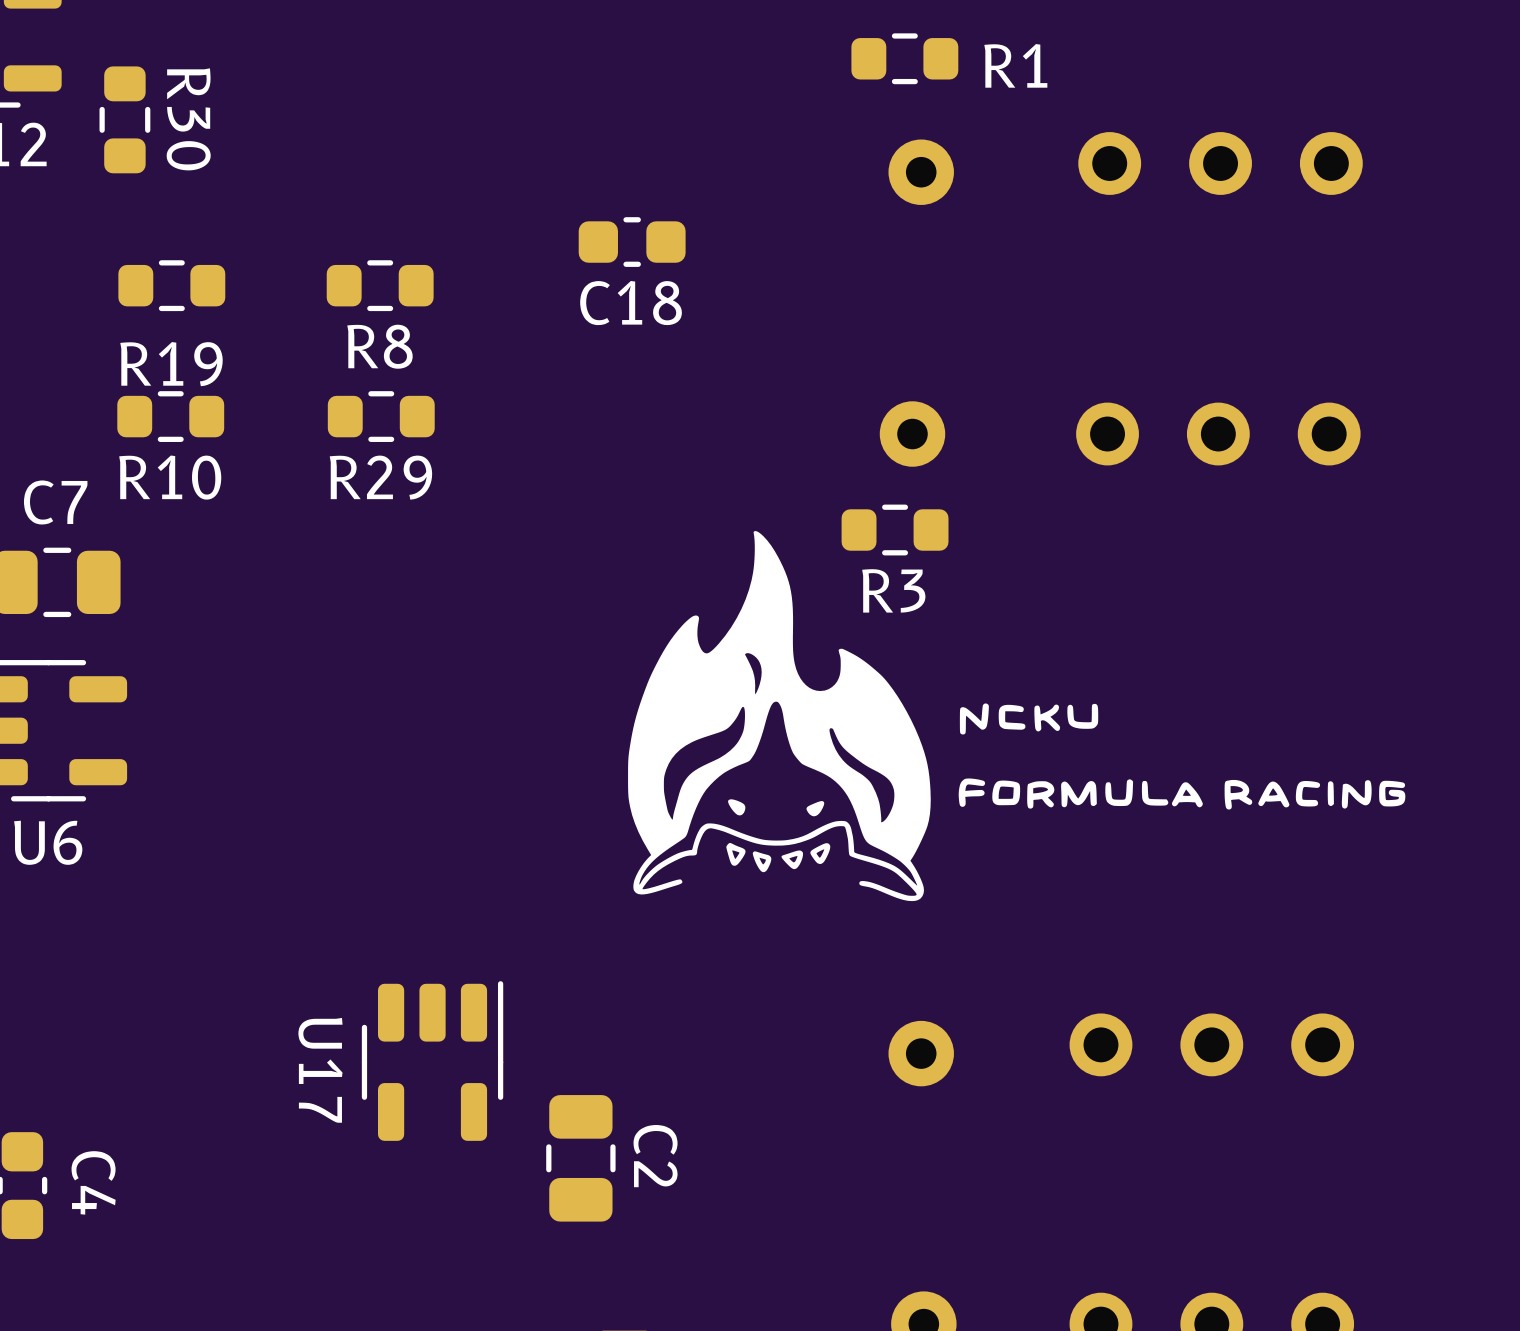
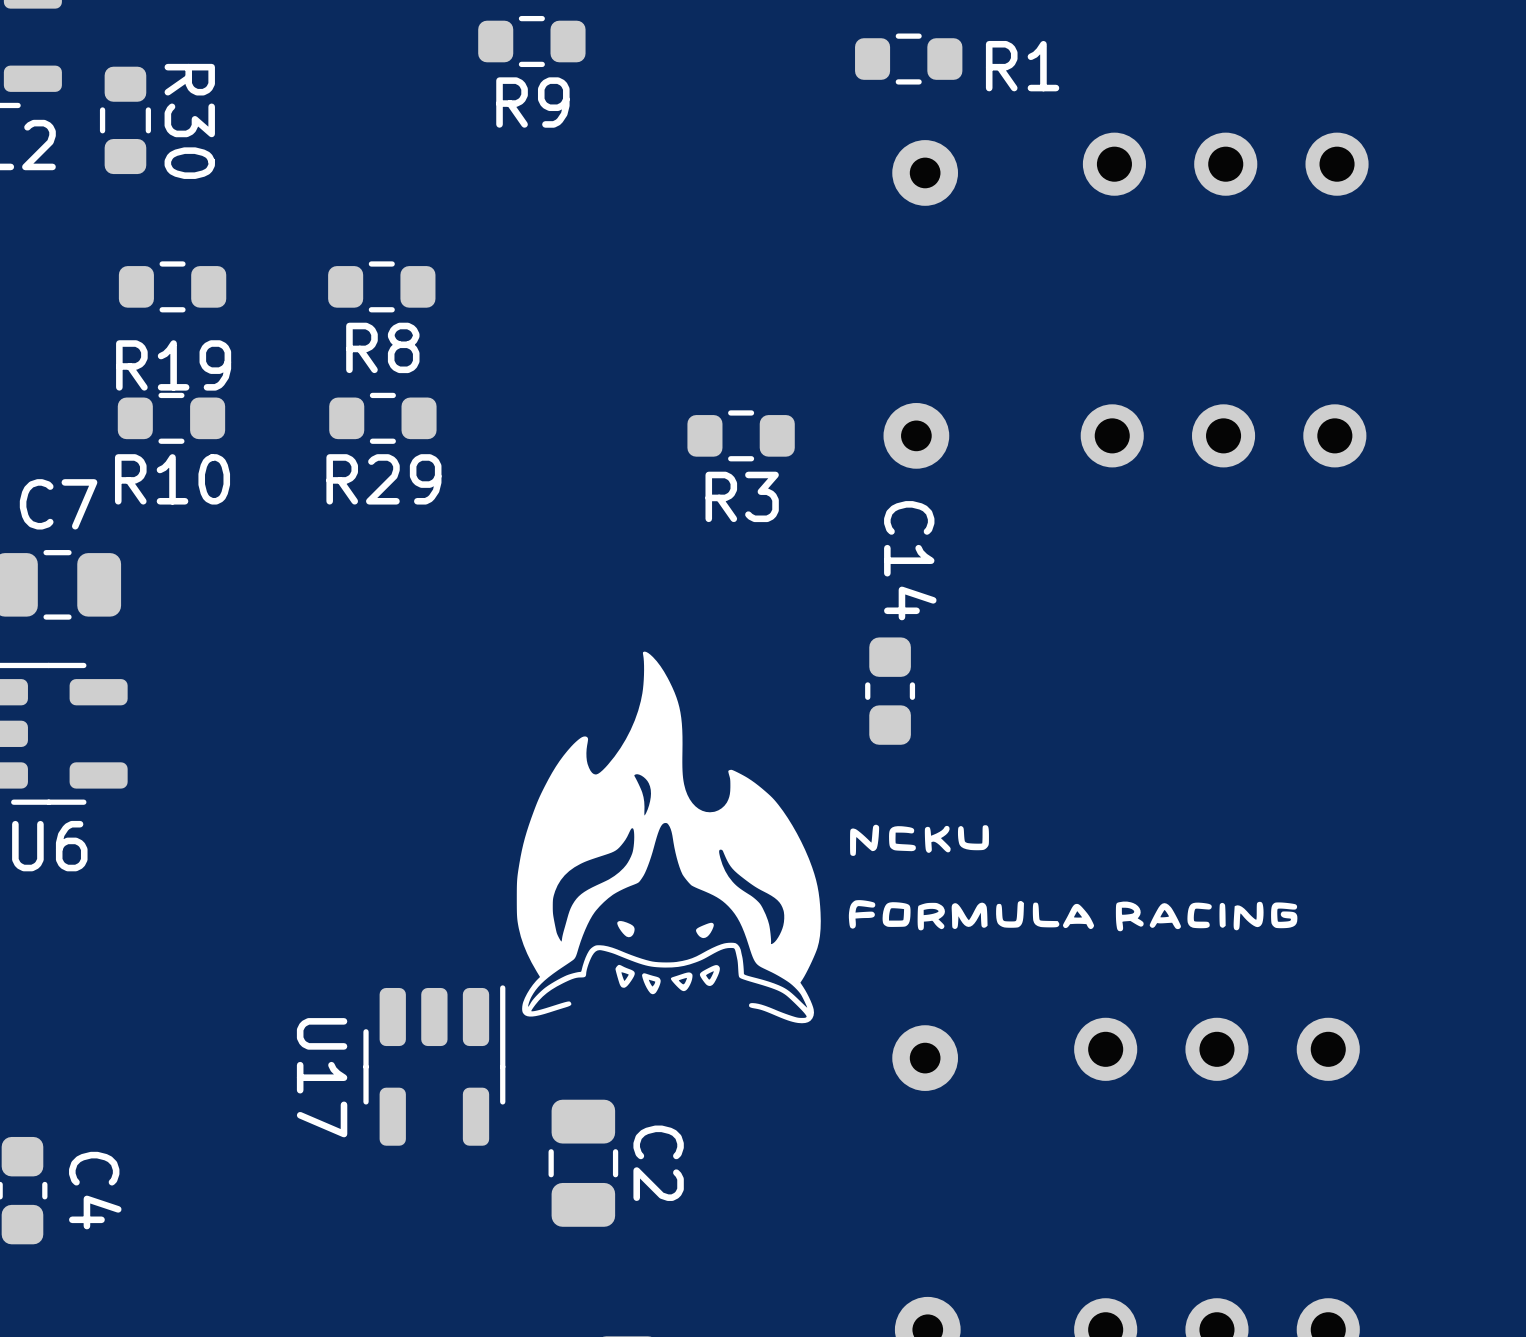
R9: none -> (531, 41)
C18: (632, 242) -> none
R3 position: (895, 530) -> (741, 435)
C14: none -> (890, 691)
drawing position: (1016, 716) -> (907, 837)

